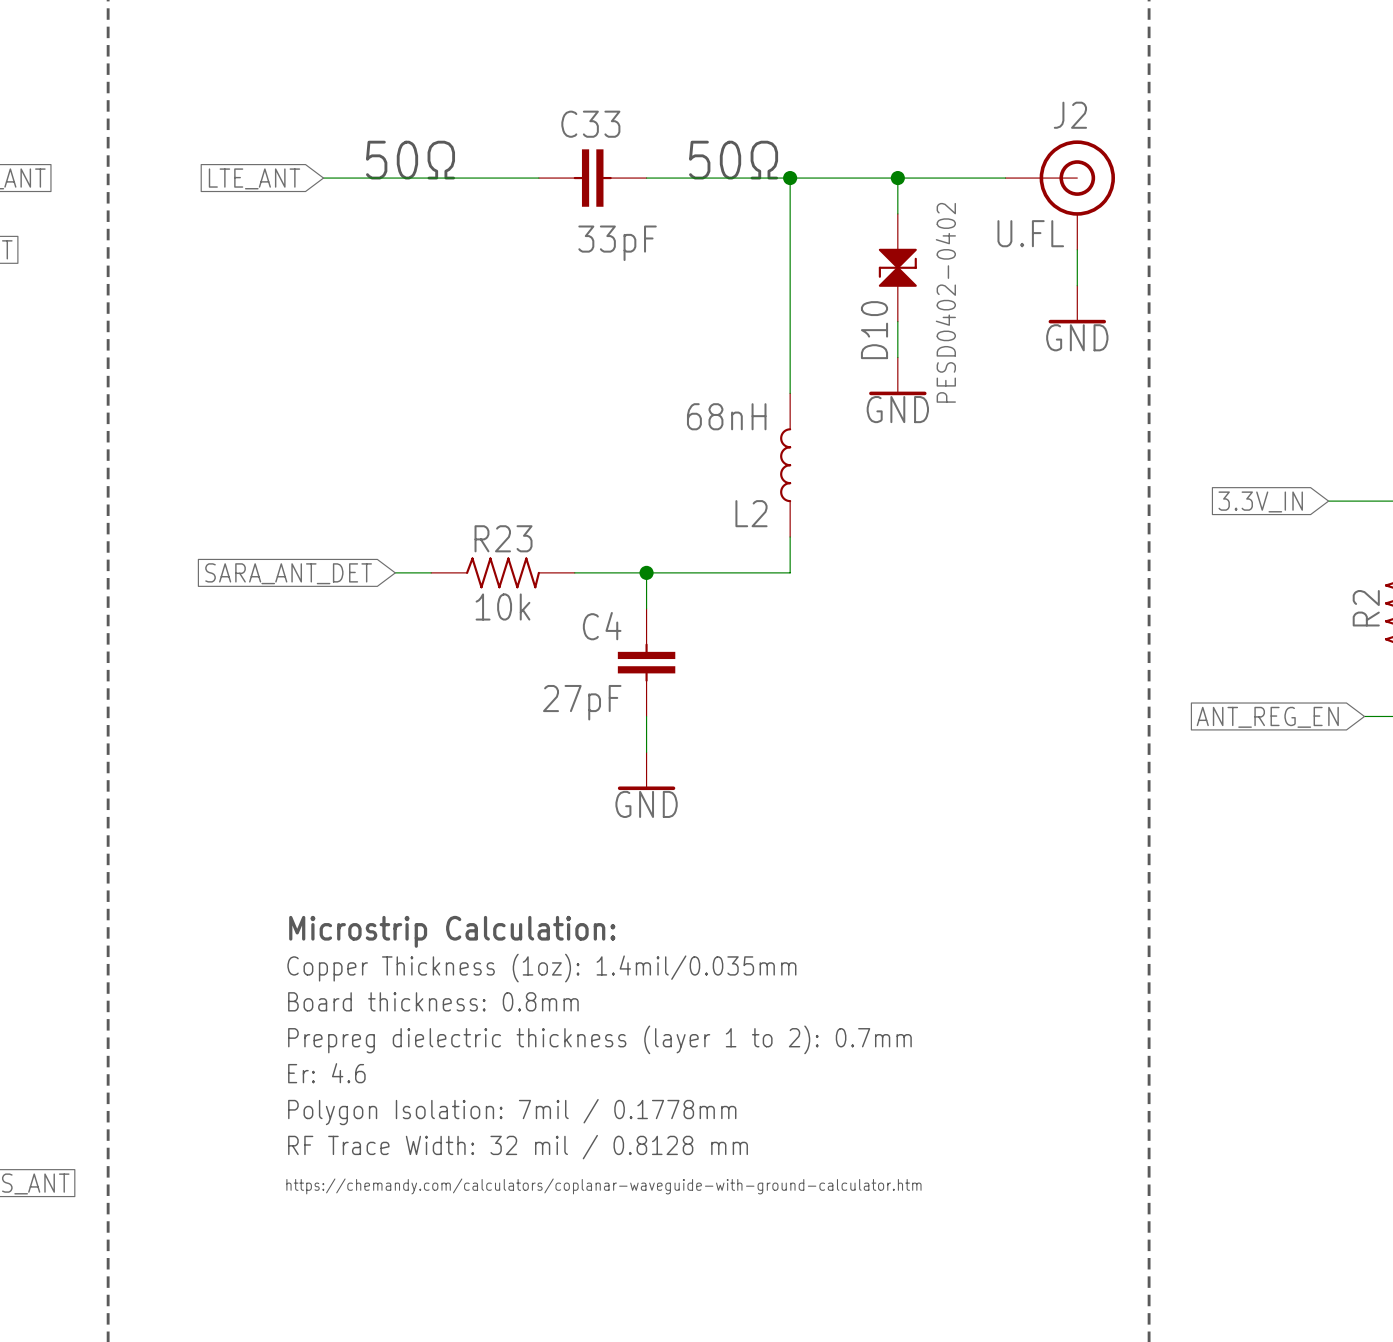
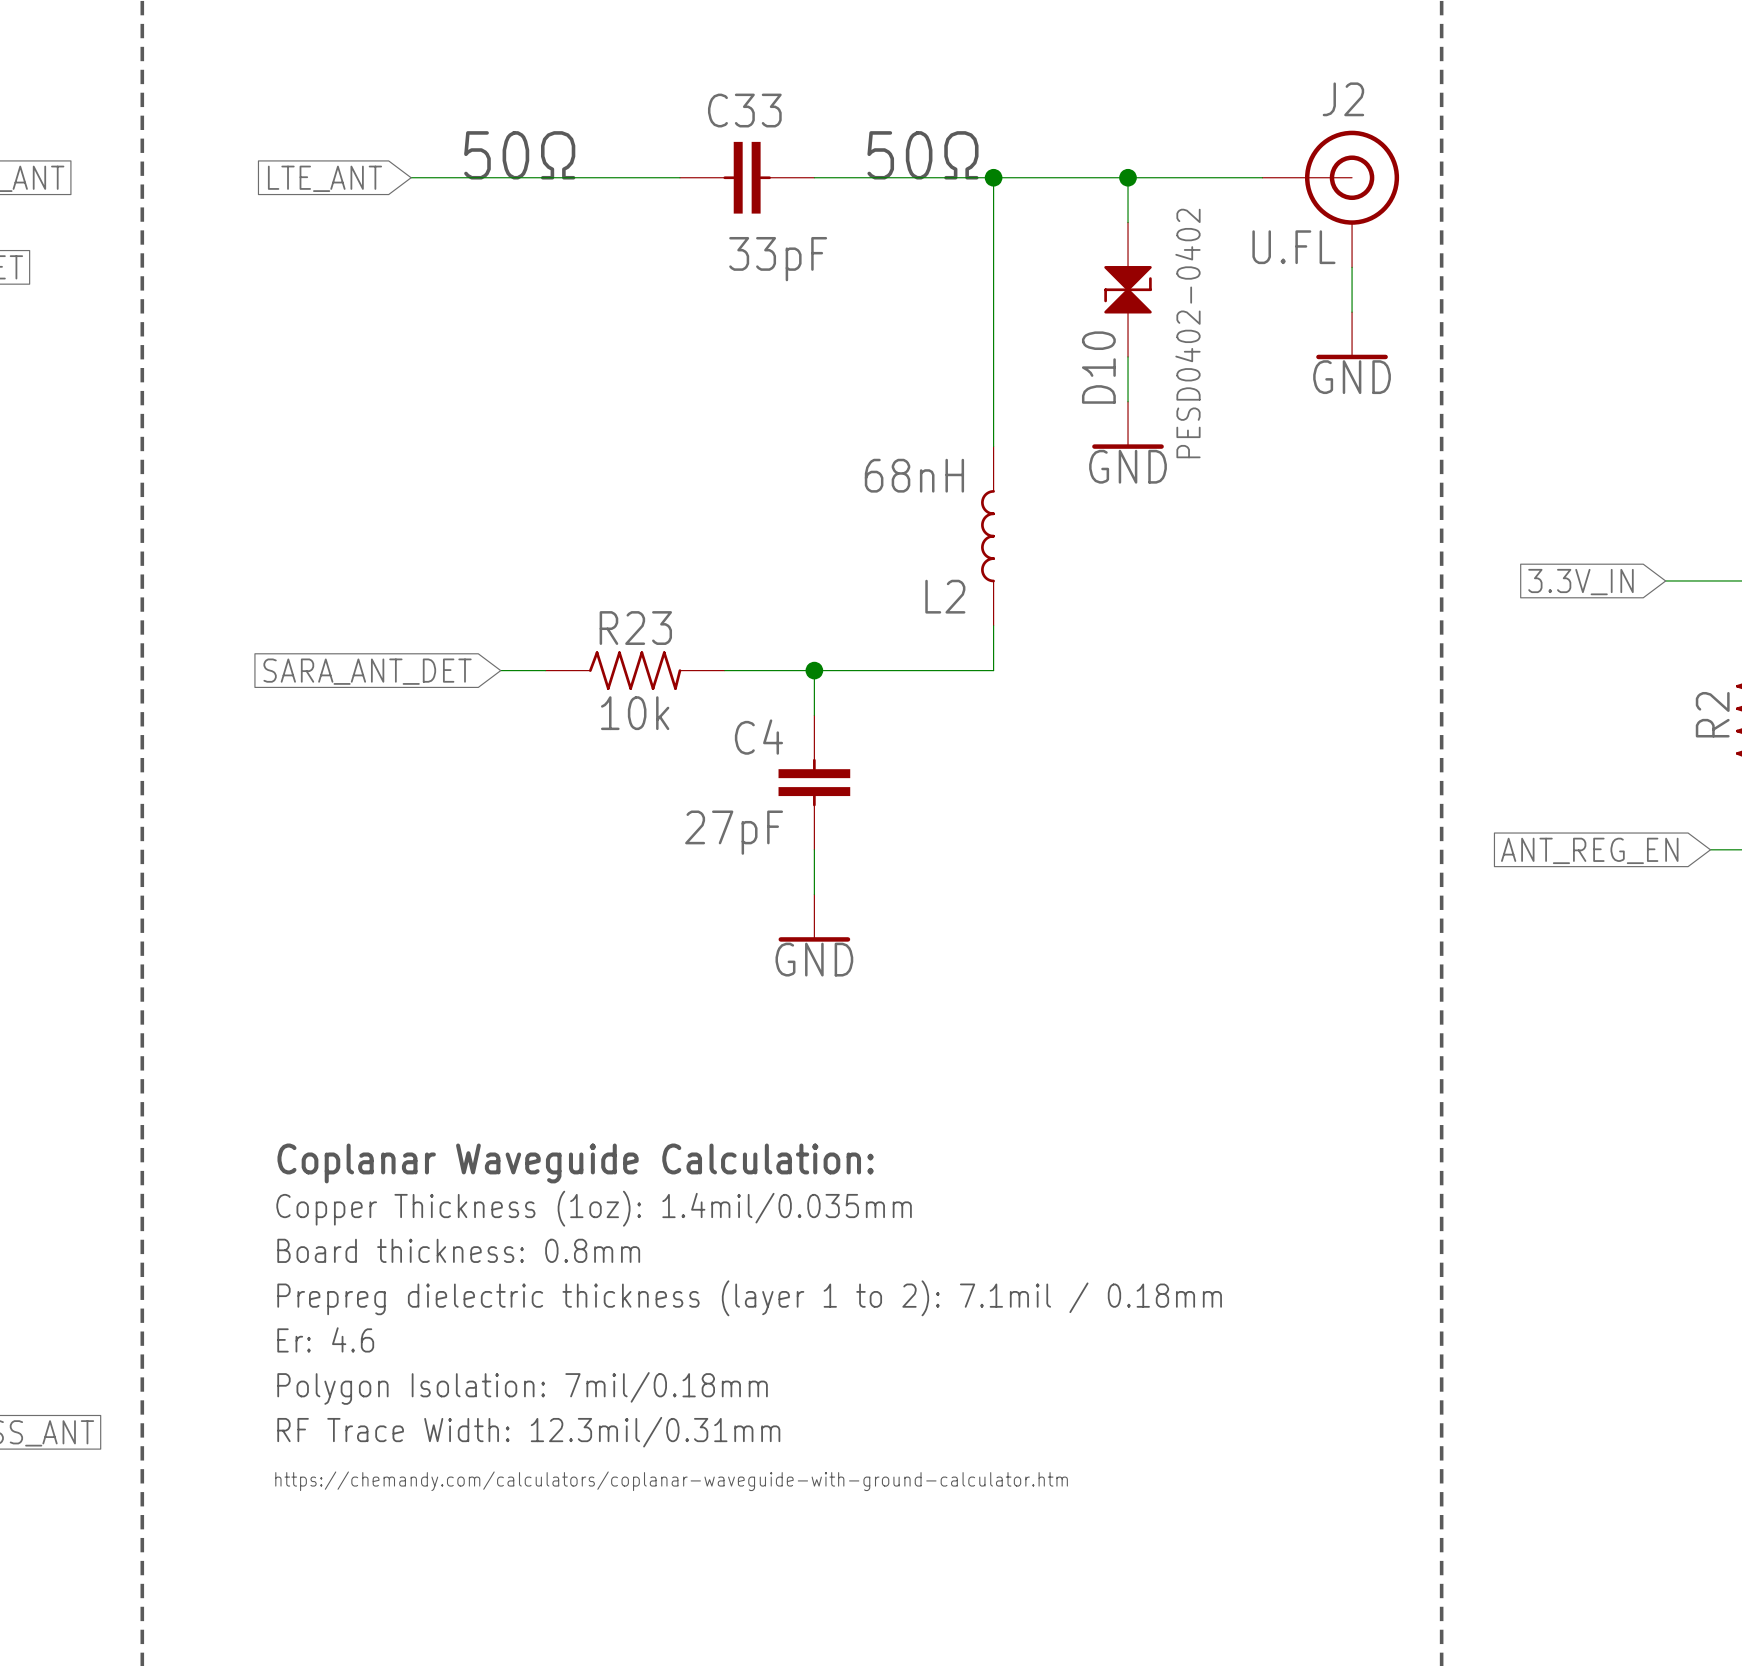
text: Microstrip Calculation: (452, 931) -> none
text: none -> Coplanar Waveguide Calculation: (575, 1163)
text position: Copper Thickness (1oz): 1.4mil/0.035mm (541, 968) -> Copper Thickness (1oz): 1.4mil/0.035mm (594, 1208)
text position: Board thickness: 0.8mm (433, 1001) -> Board thickness: 0.8mm (458, 1250)
text: Prepreg dielectric thickness (layer 1 to 2): 0.7mm (599, 1039) -> Prepreg dielectric thickness (layer 1 to 2): 7.1mil / 0.18mm (749, 1298)
text position: Er: 4.6 (326, 1073) -> Er: 4.6 (325, 1339)
text: Polygon Isolation: 7mil / 0.1778mm (512, 1112) -> Polygon Isolation: 7mil/0.18mm (522, 1388)
text: RF Trace Width: 32 mil / 0.8128 mm (518, 1147) -> RF Trace Width: 12.3mil/0.31mm (528, 1432)
text position: https://chemandy.com/calculators/coplanar-waveguide-with-ground-calculator.htm (603, 1186) -> https://chemandy.com/calculators/coplanar-waveguide-with-ground-calculator.htm (671, 1481)

